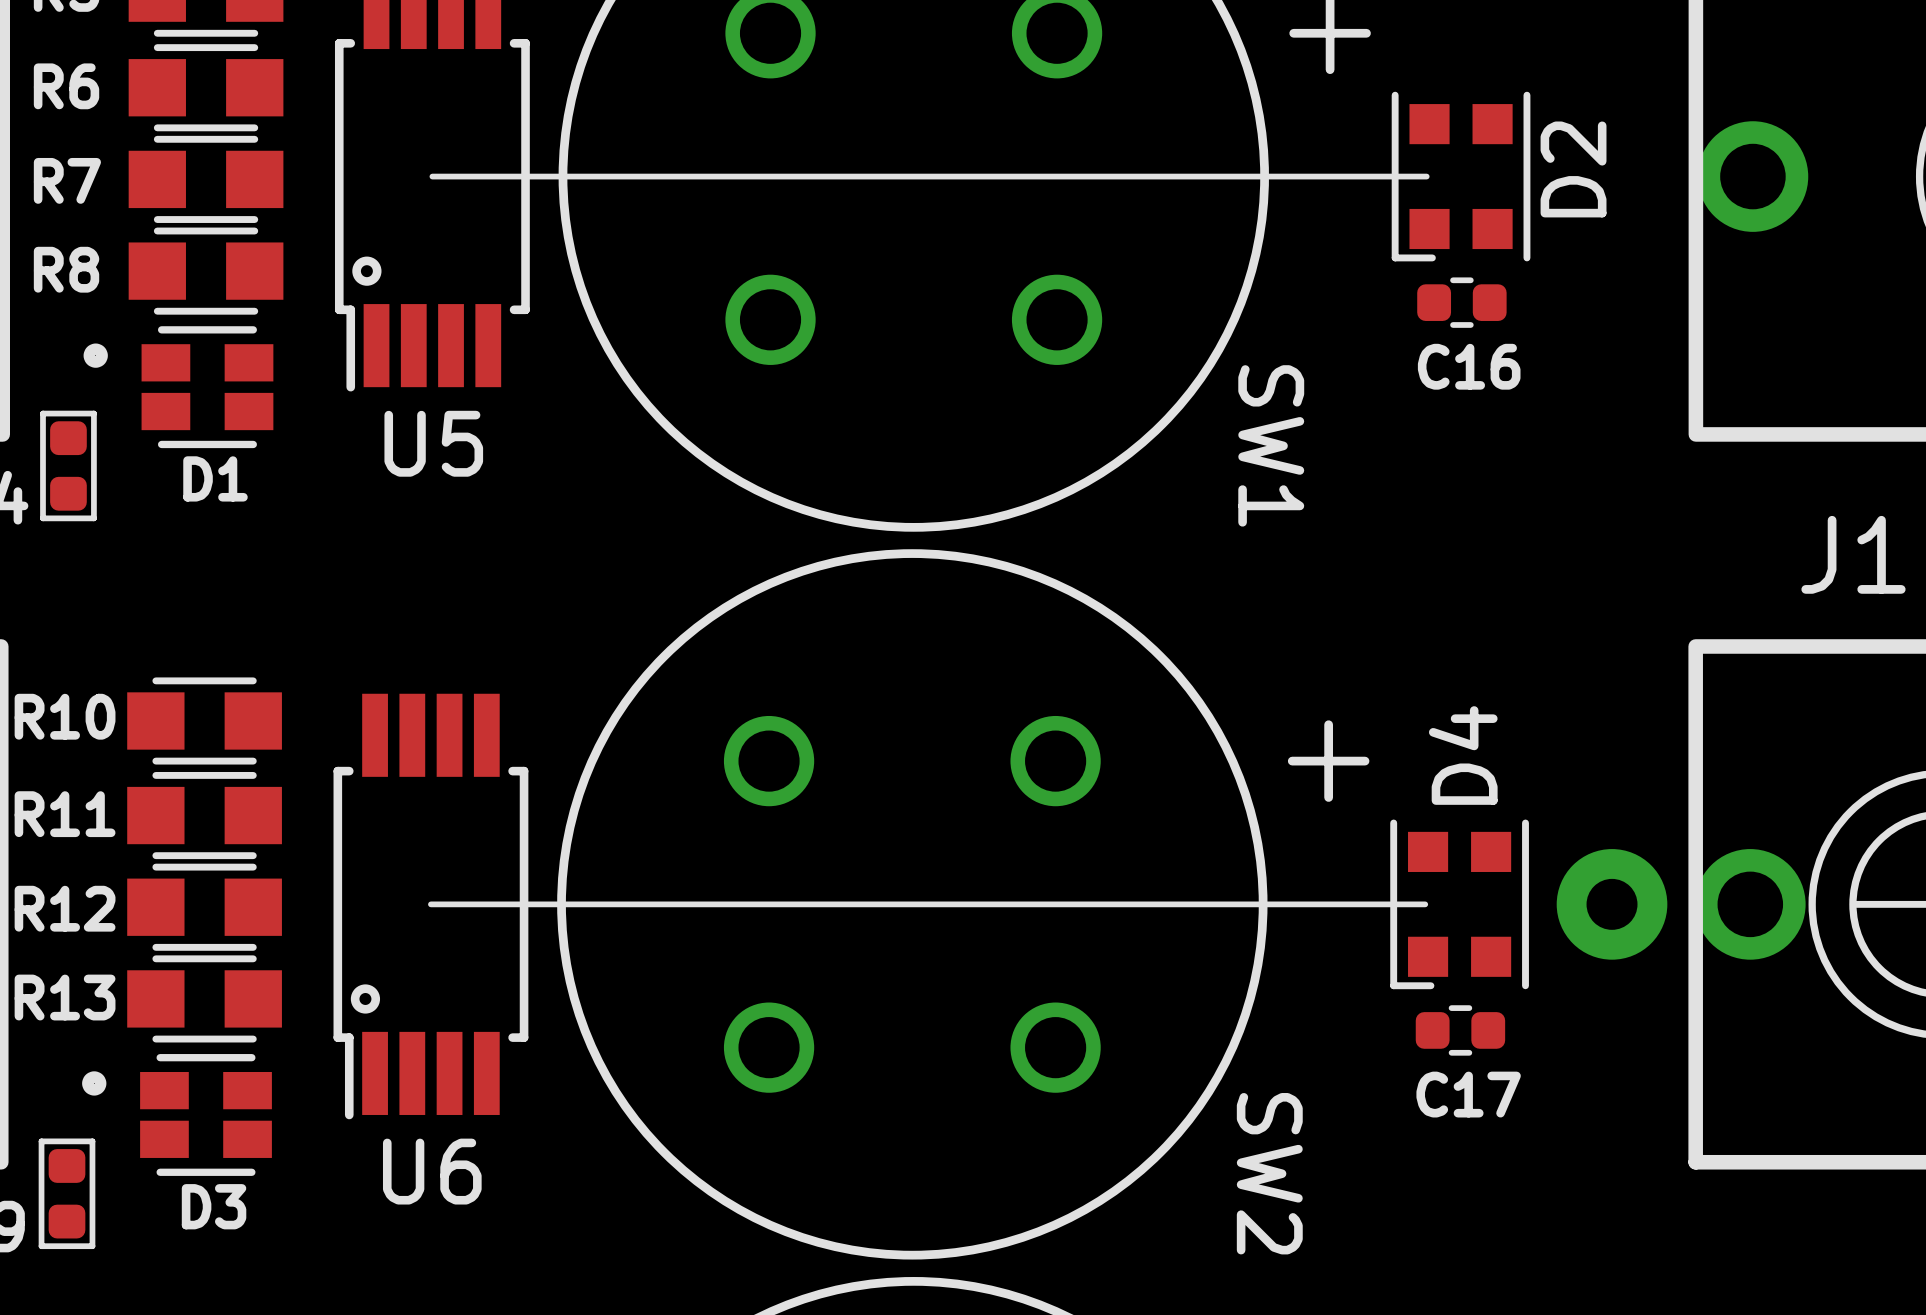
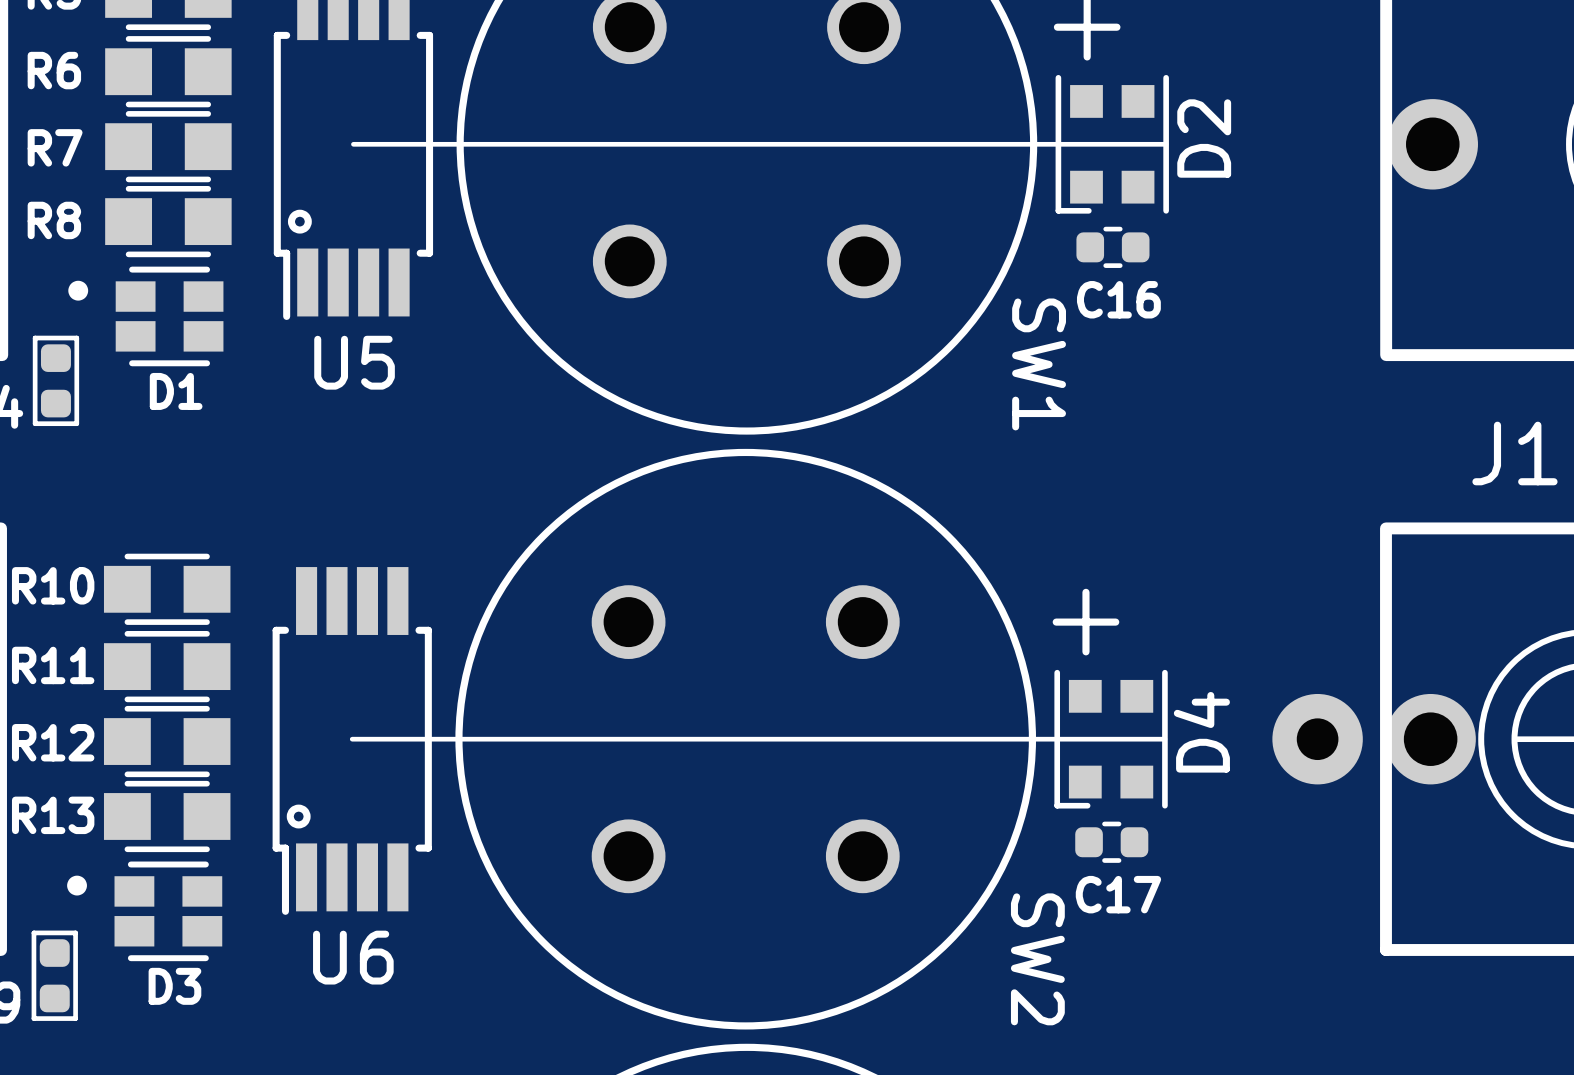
D2 position: (1461, 176) -> (1112, 144)
C16 position: (1461, 302) -> (1112, 247)
D4 name position: D4 (1463, 755) -> D4 (1201, 732)
D4 position: (1459, 904) -> (1111, 739)
C17 position: (1460, 1030) -> (1111, 842)

